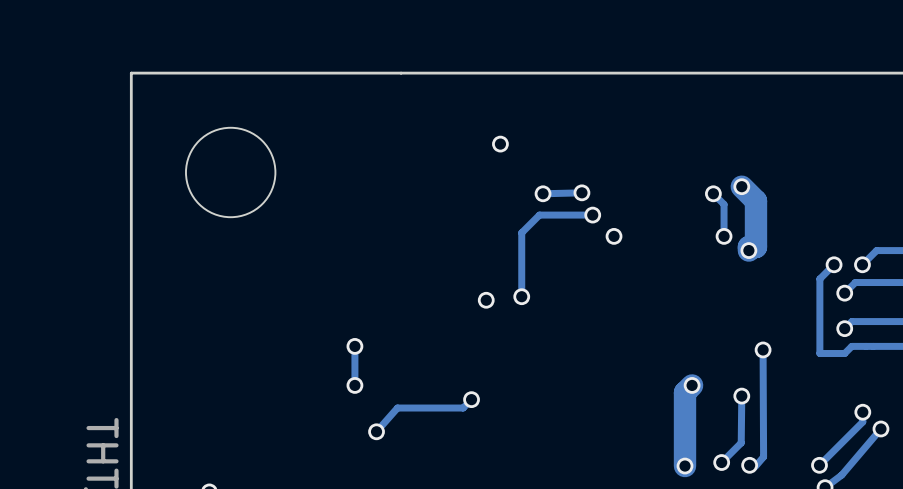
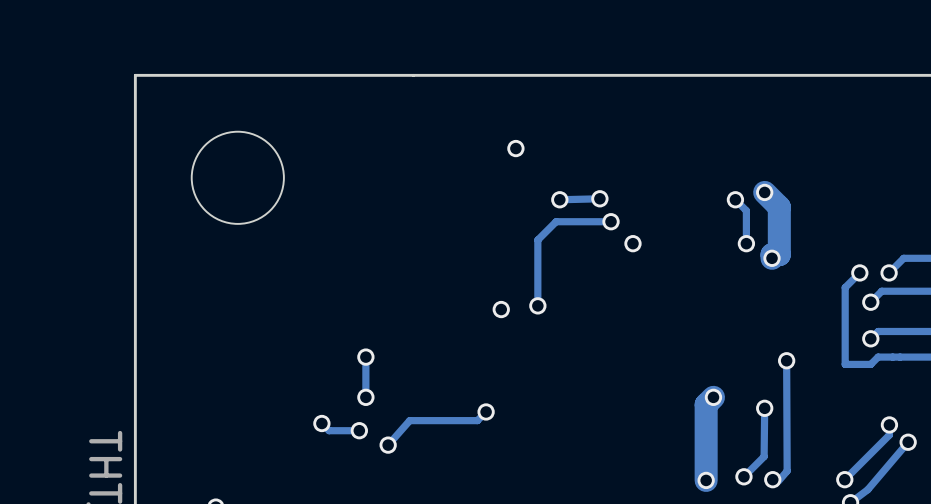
track: none -> (321, 423) (329, 430) (359, 430)
via: none -> (321, 423)
via: none -> (359, 430)

